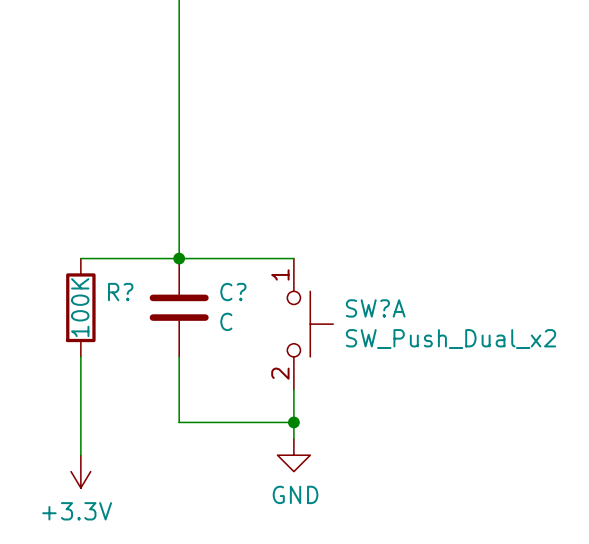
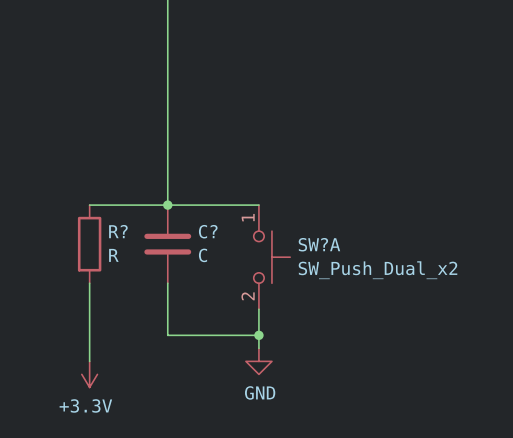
R? value: 100K (80, 307) -> R (113, 255)

